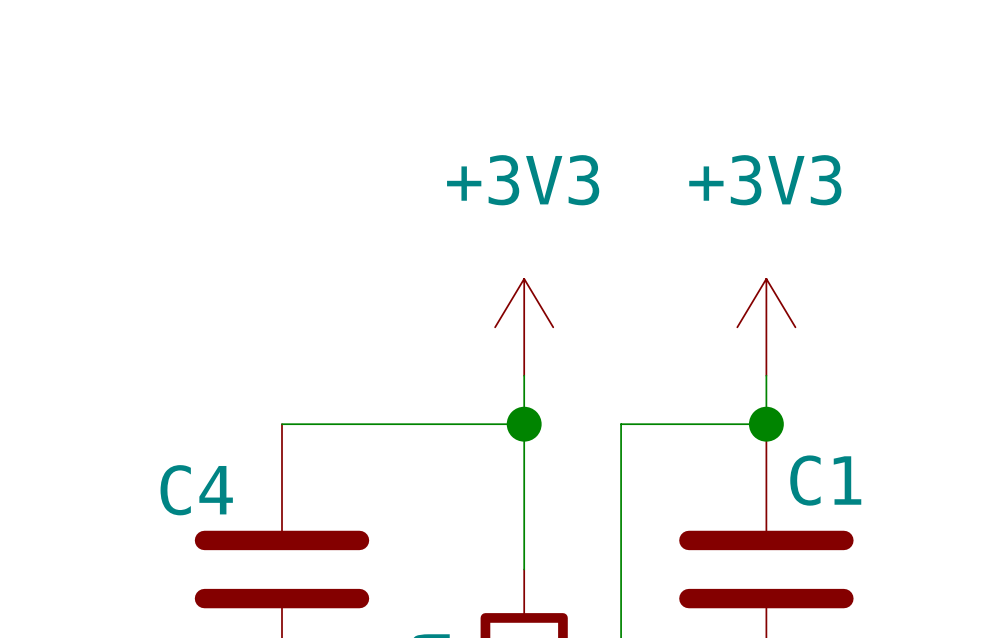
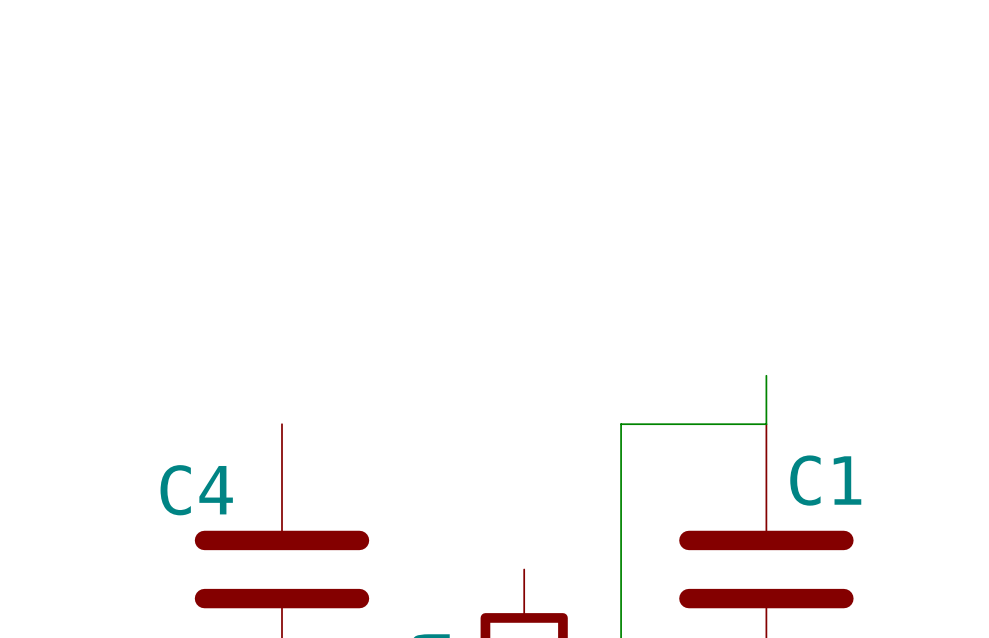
power symbol: +3V3 (524, 327) -> none
power symbol: +3V3 (766, 327) -> none
wire: (524, 375) (524, 569) -> none
wire: (282, 424) (524, 424) -> none
junction: (524, 424) -> none
junction: (766, 424) -> none

